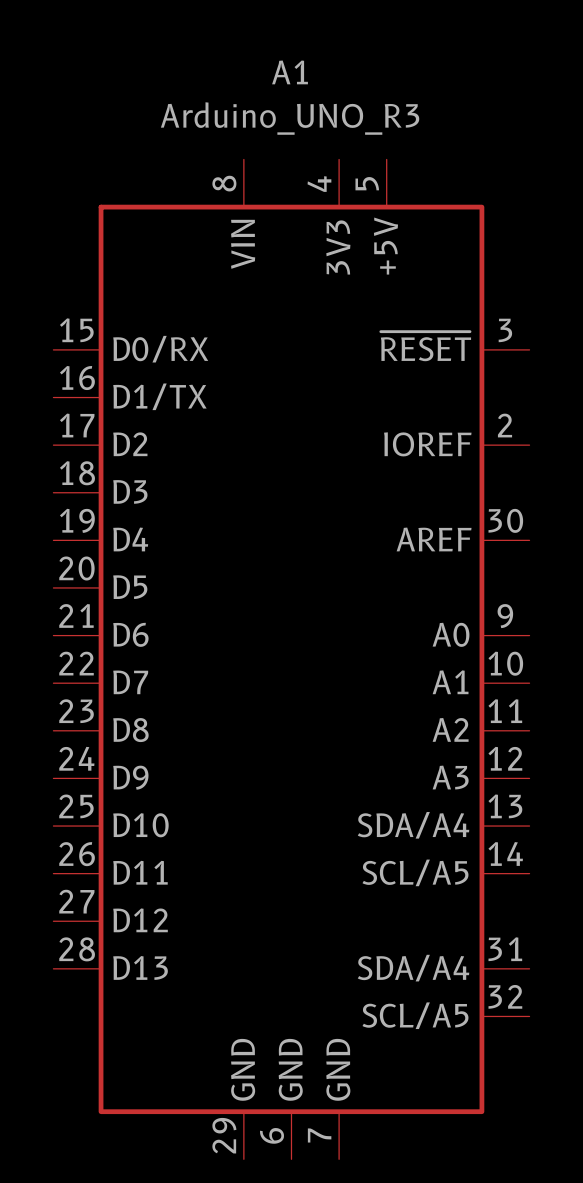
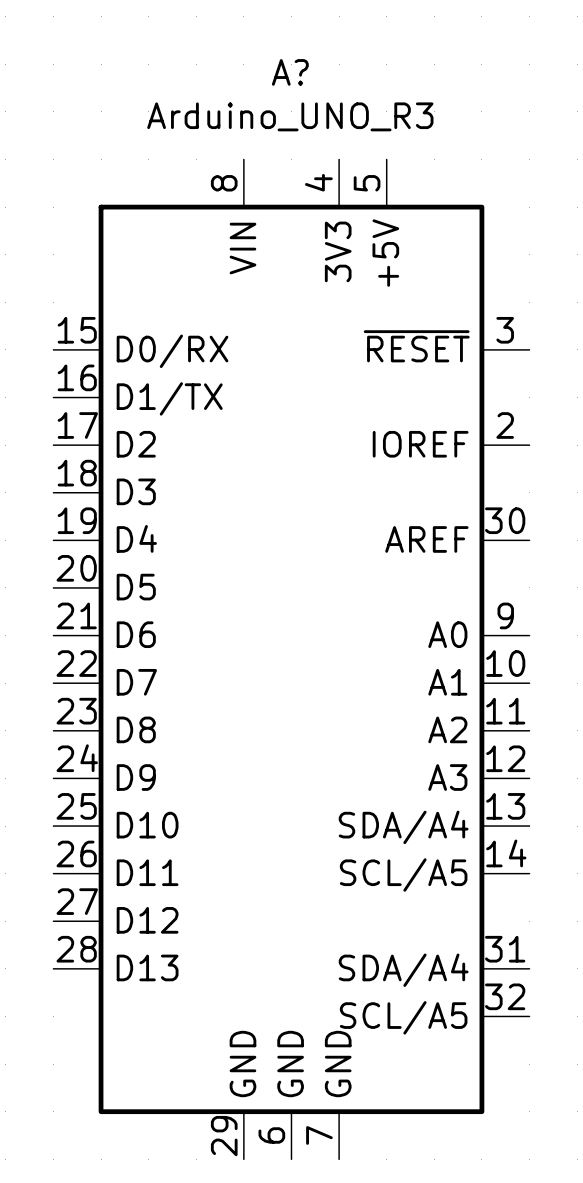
A1 name: A1 (290, 72) -> A? (290, 72)

